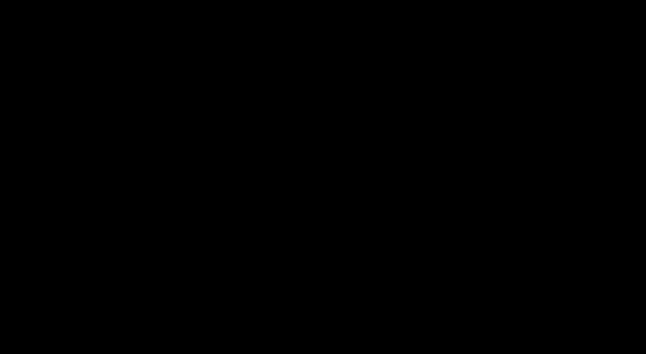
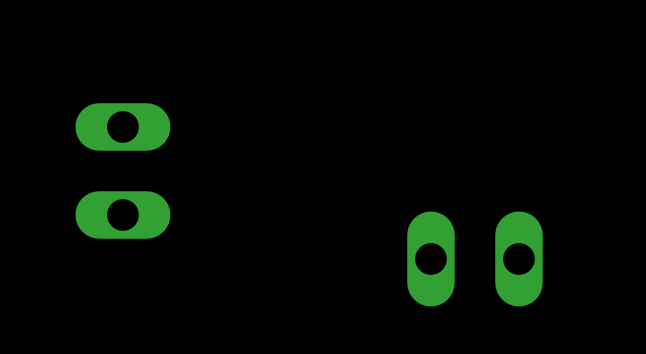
part: none -> (122, 170)
part: none -> (474, 258)

